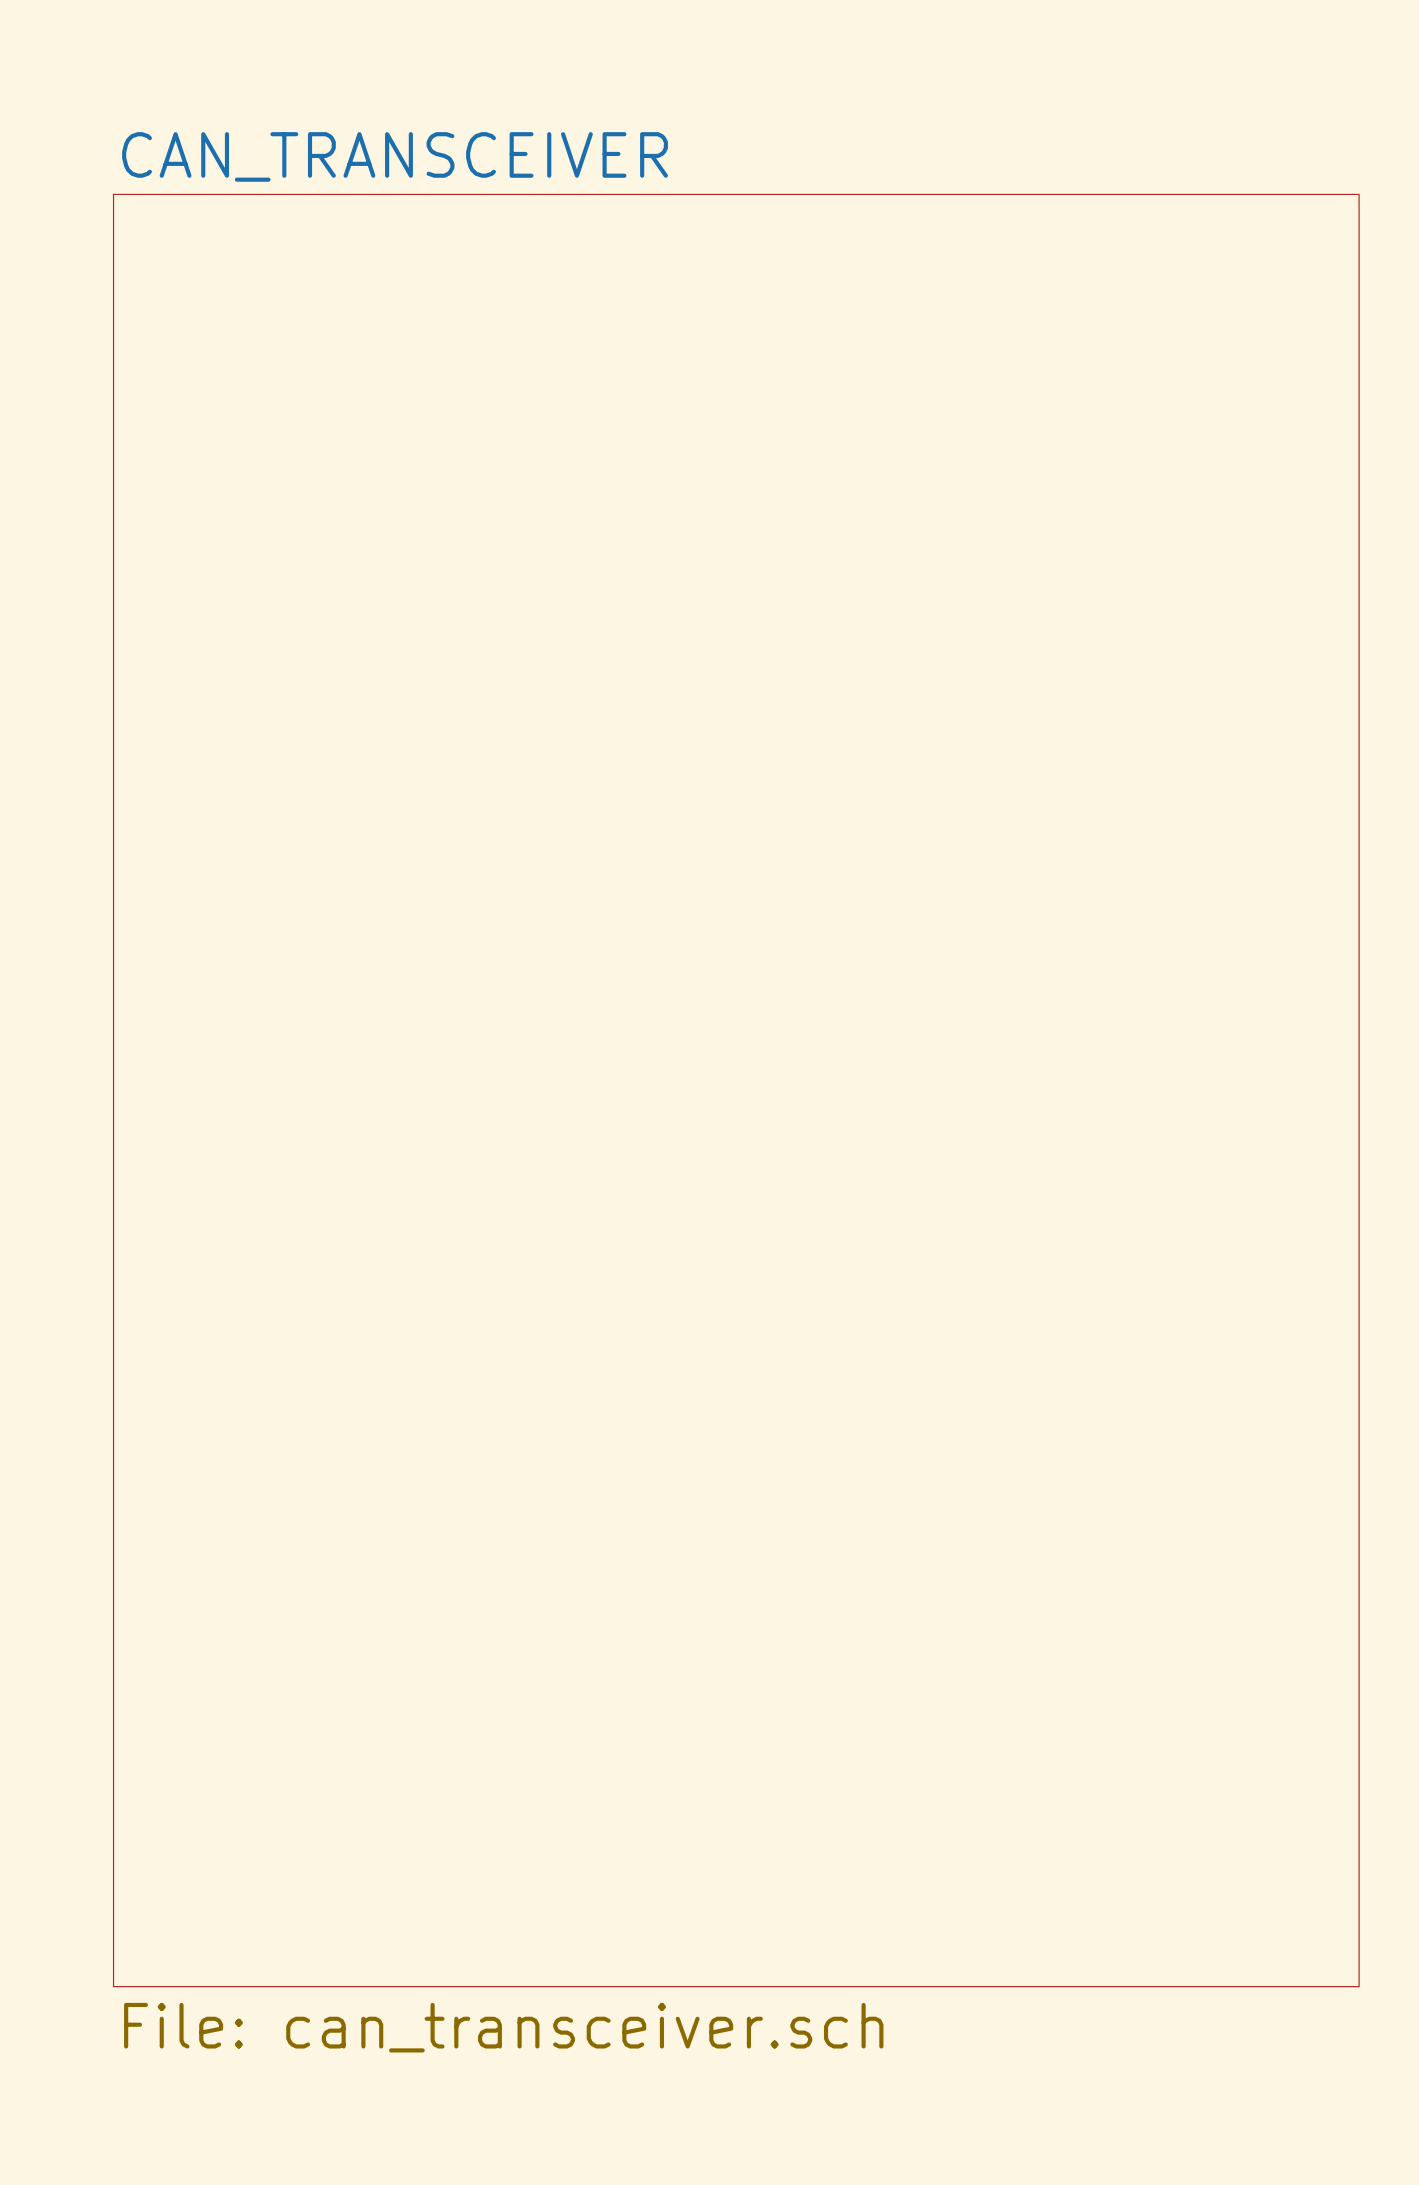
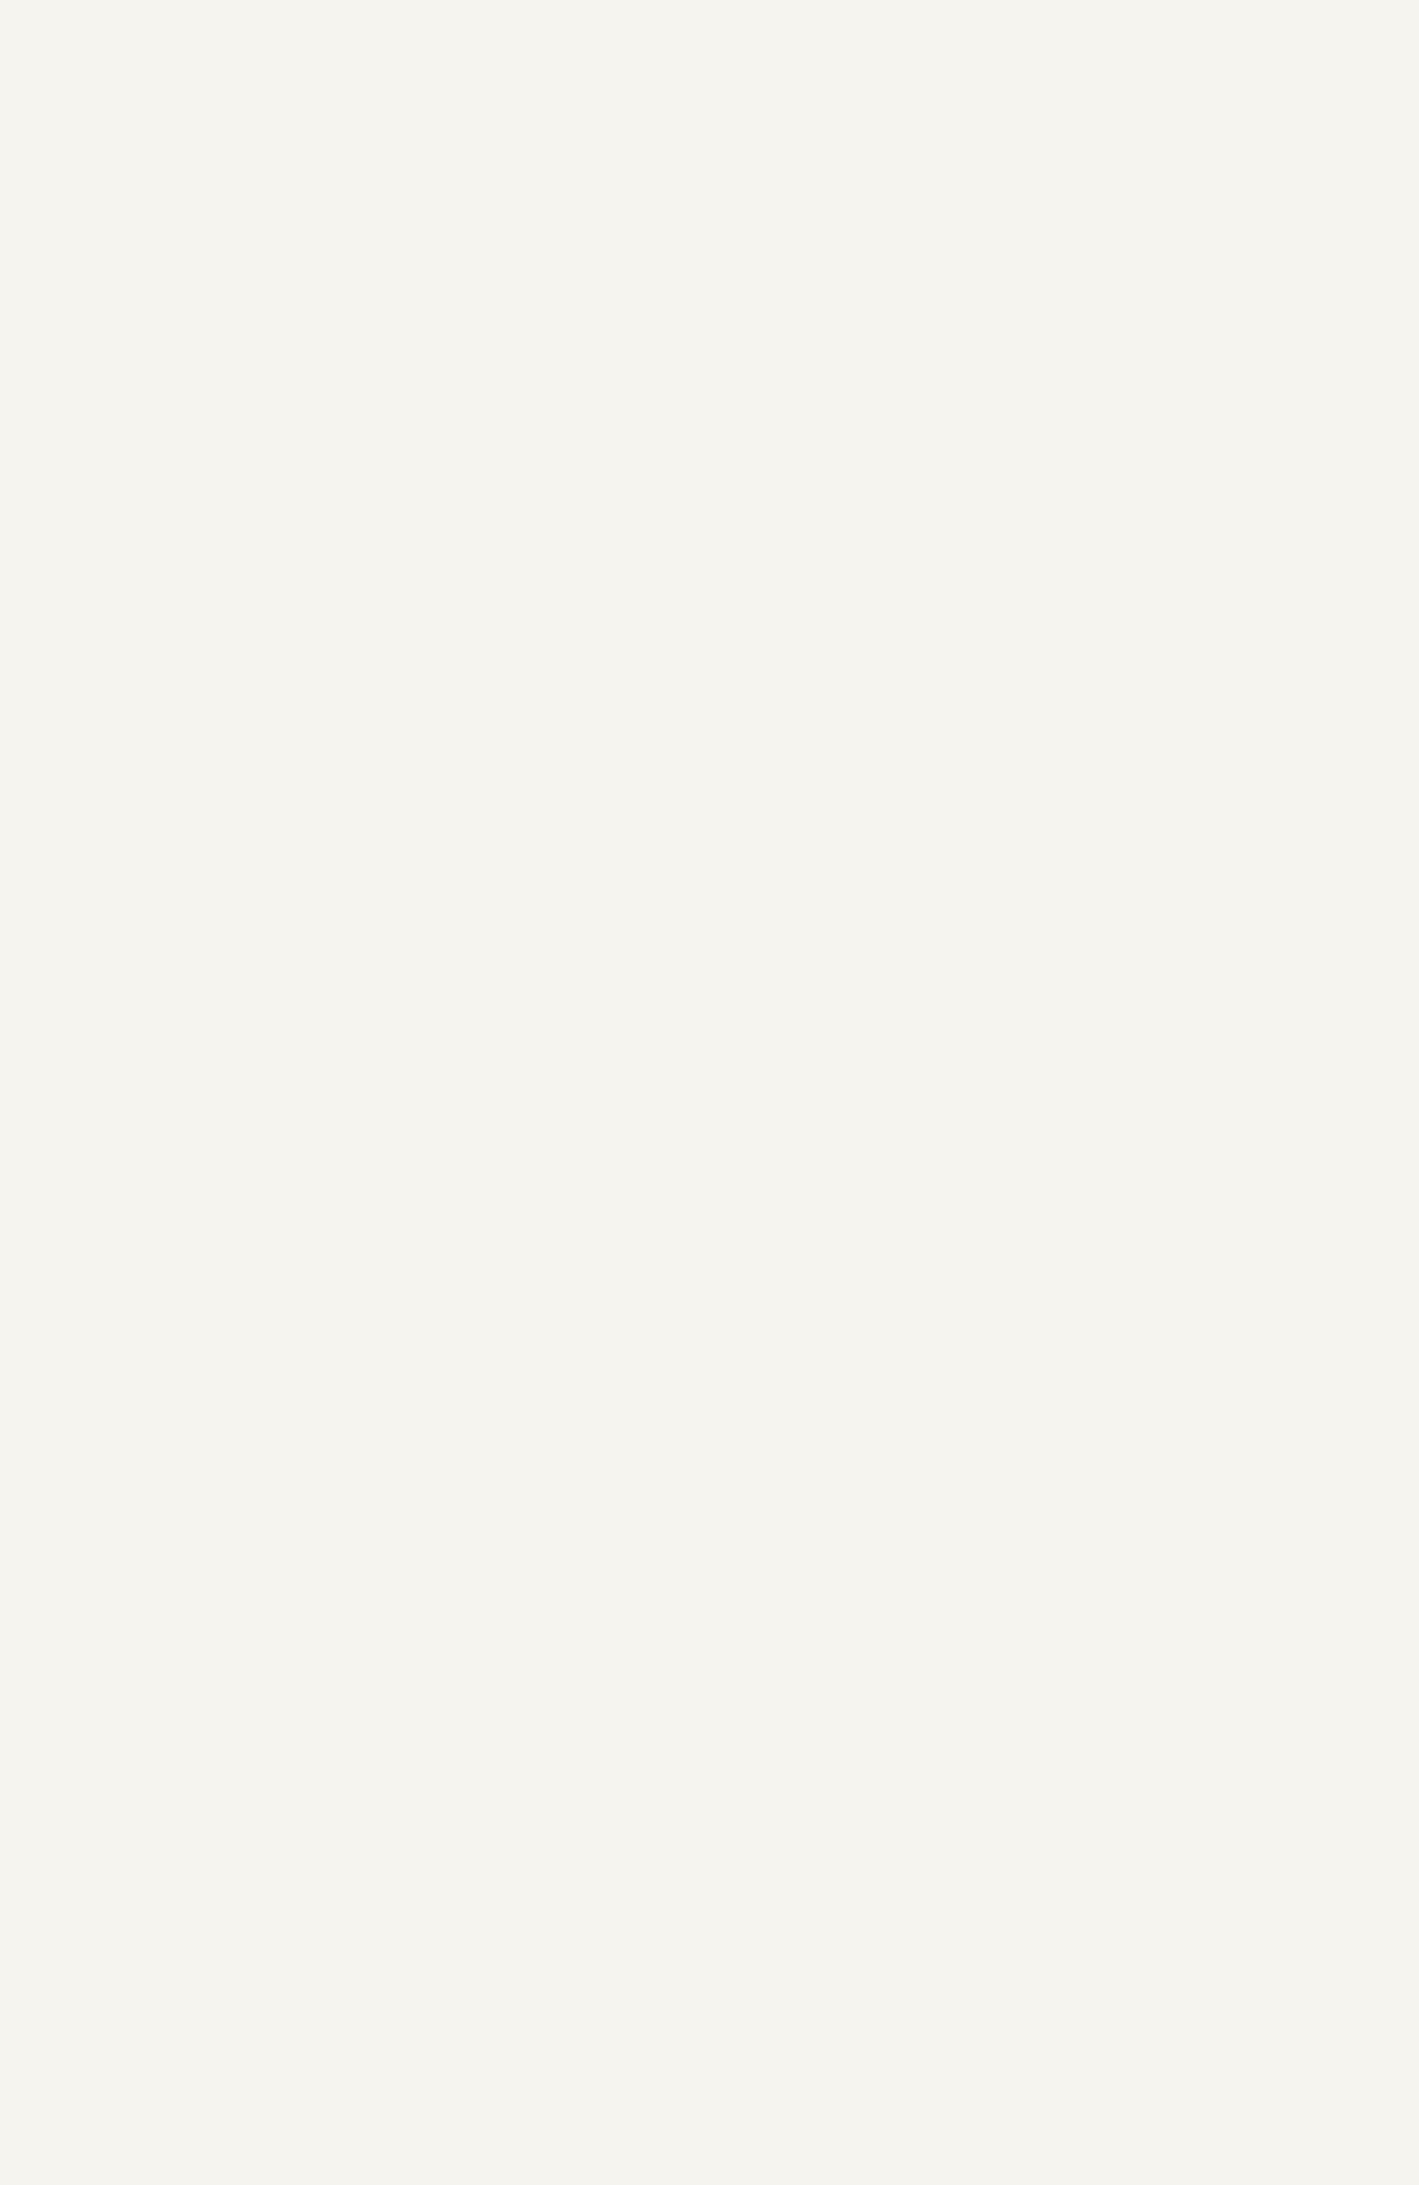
sheet CAN_TRANSCEIVER: File: can_transceiver.sch (736, 1090) -> none

